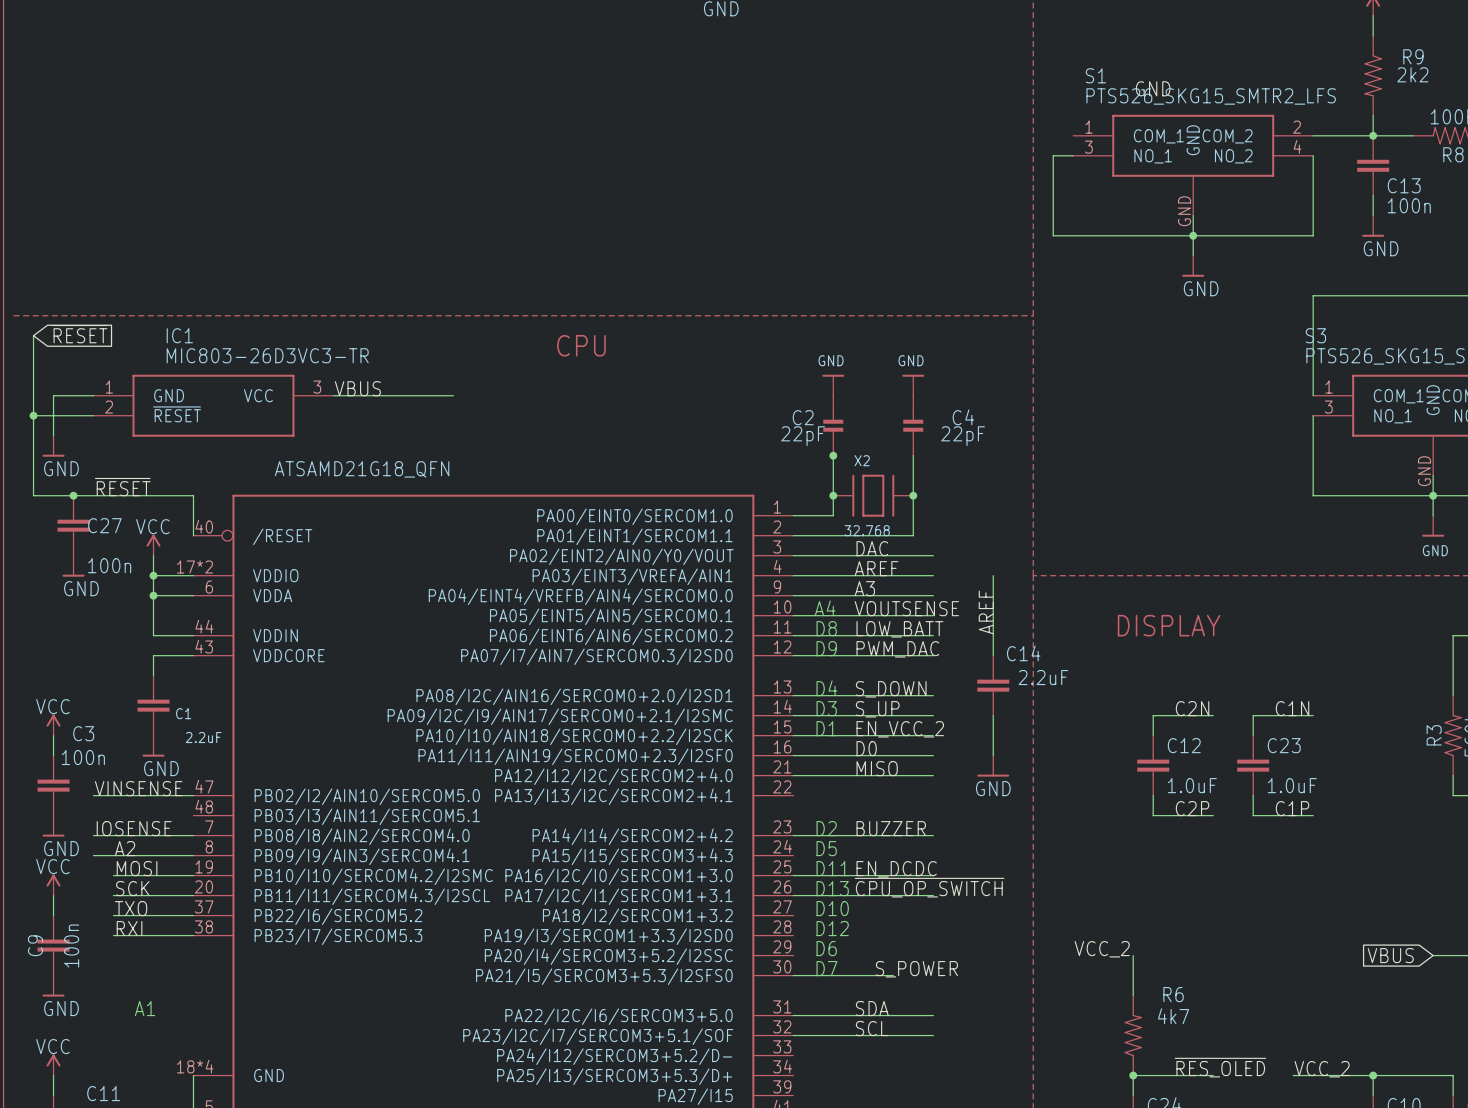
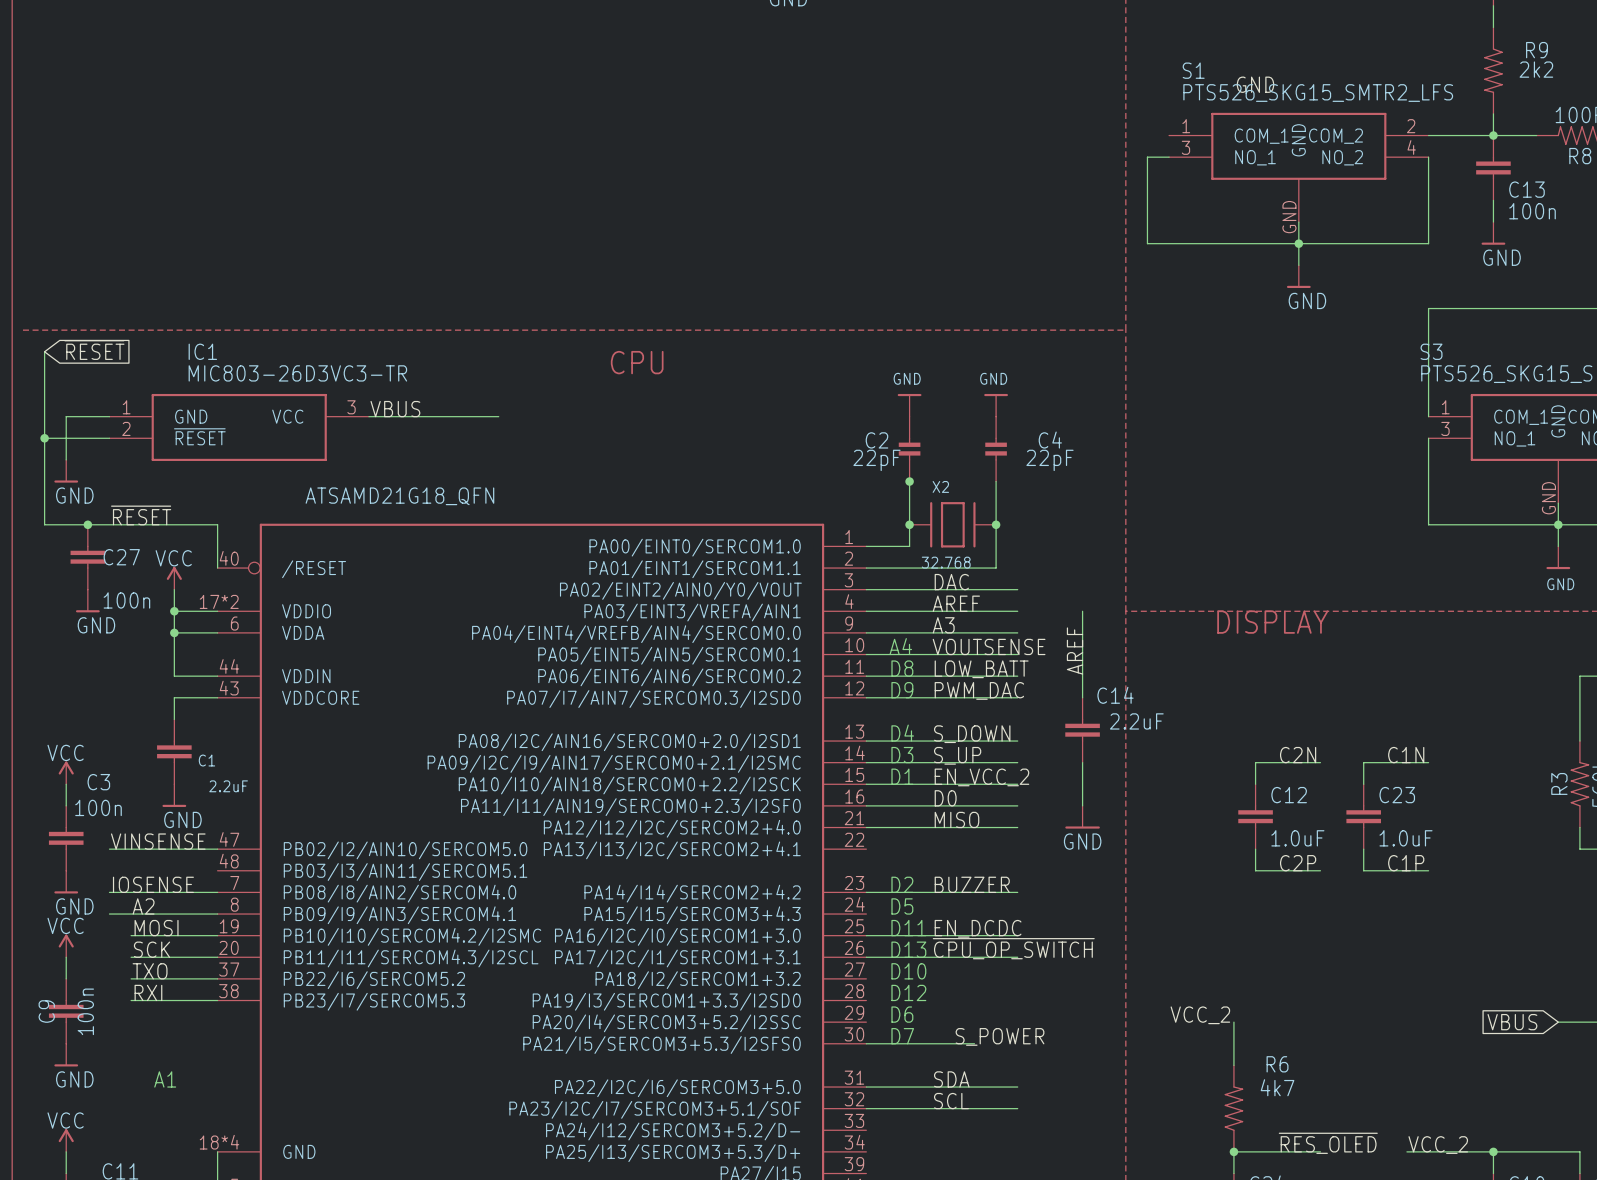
text position: DISPLAY (1169, 625) -> DISPLAY (1272, 622)

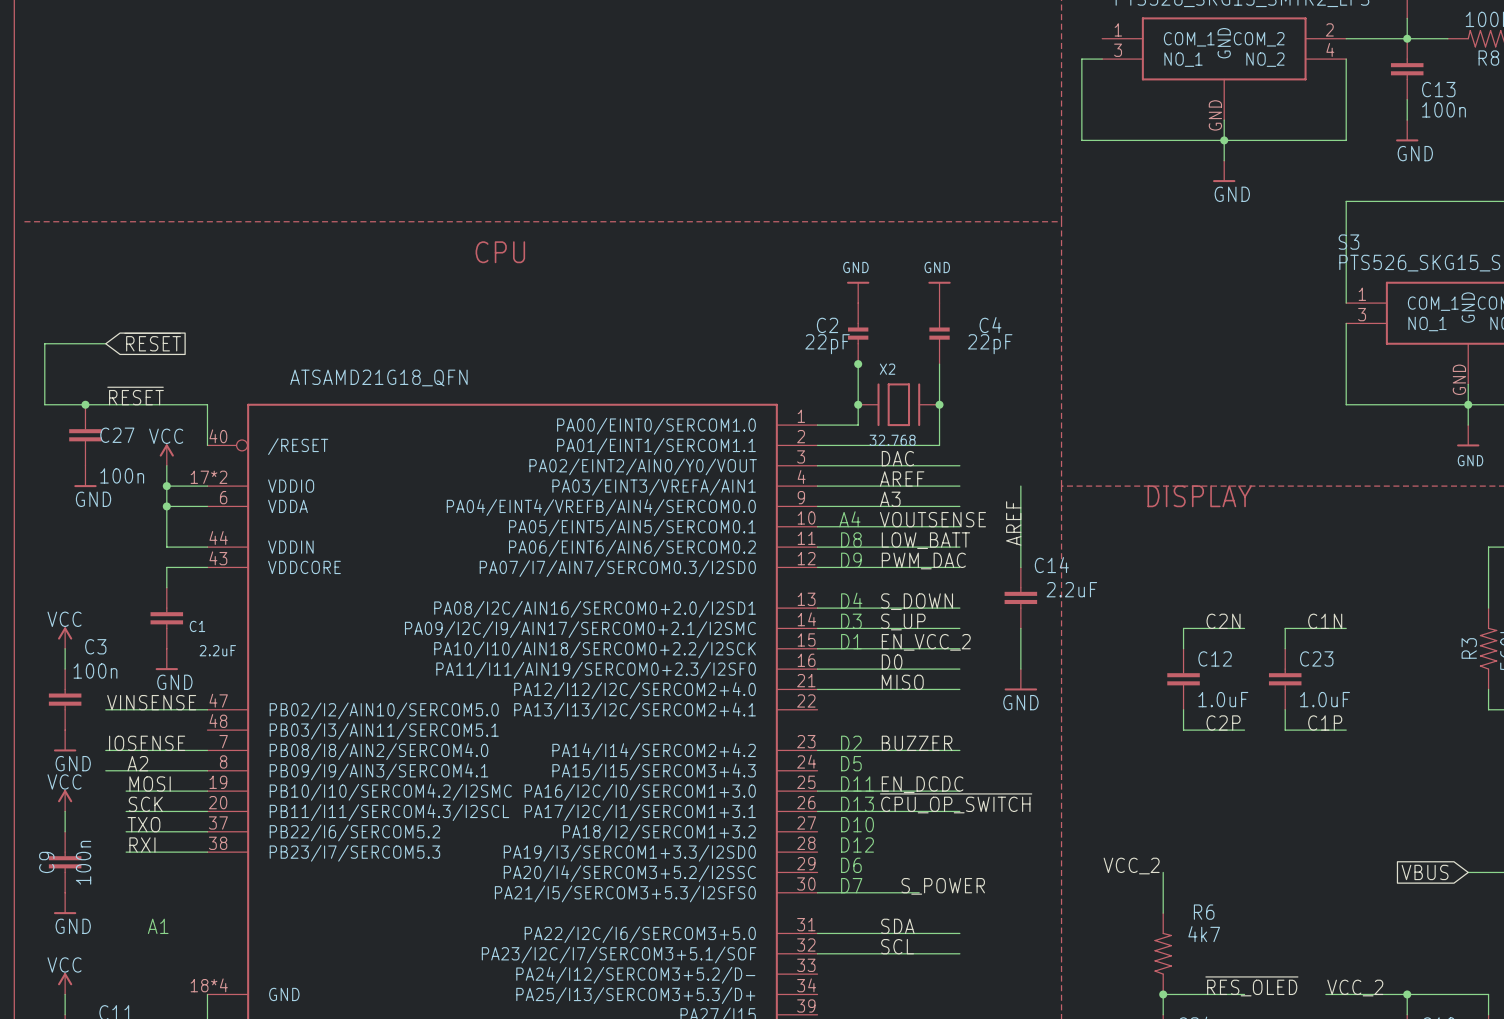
global label position: ~{RESET} (94, 350) -> ~{RESET} (152, 342)
wire: (44, 351) (44, 459) -> (105, 343) (44, 343)
text position: CPU (637, 362) -> CPU (500, 252)
label: VBUS (395, 409) -> none
wire: (109, 416) (66, 416) (66, 459) -> none
wire: (368, 416) (498, 416) -> none
IC1: MIC803-26D3VC3-TR (239, 427) -> none
wire: (44, 438) (109, 438) -> none
junction: (44, 438) -> none
power symbol: GND (66, 471) -> none

